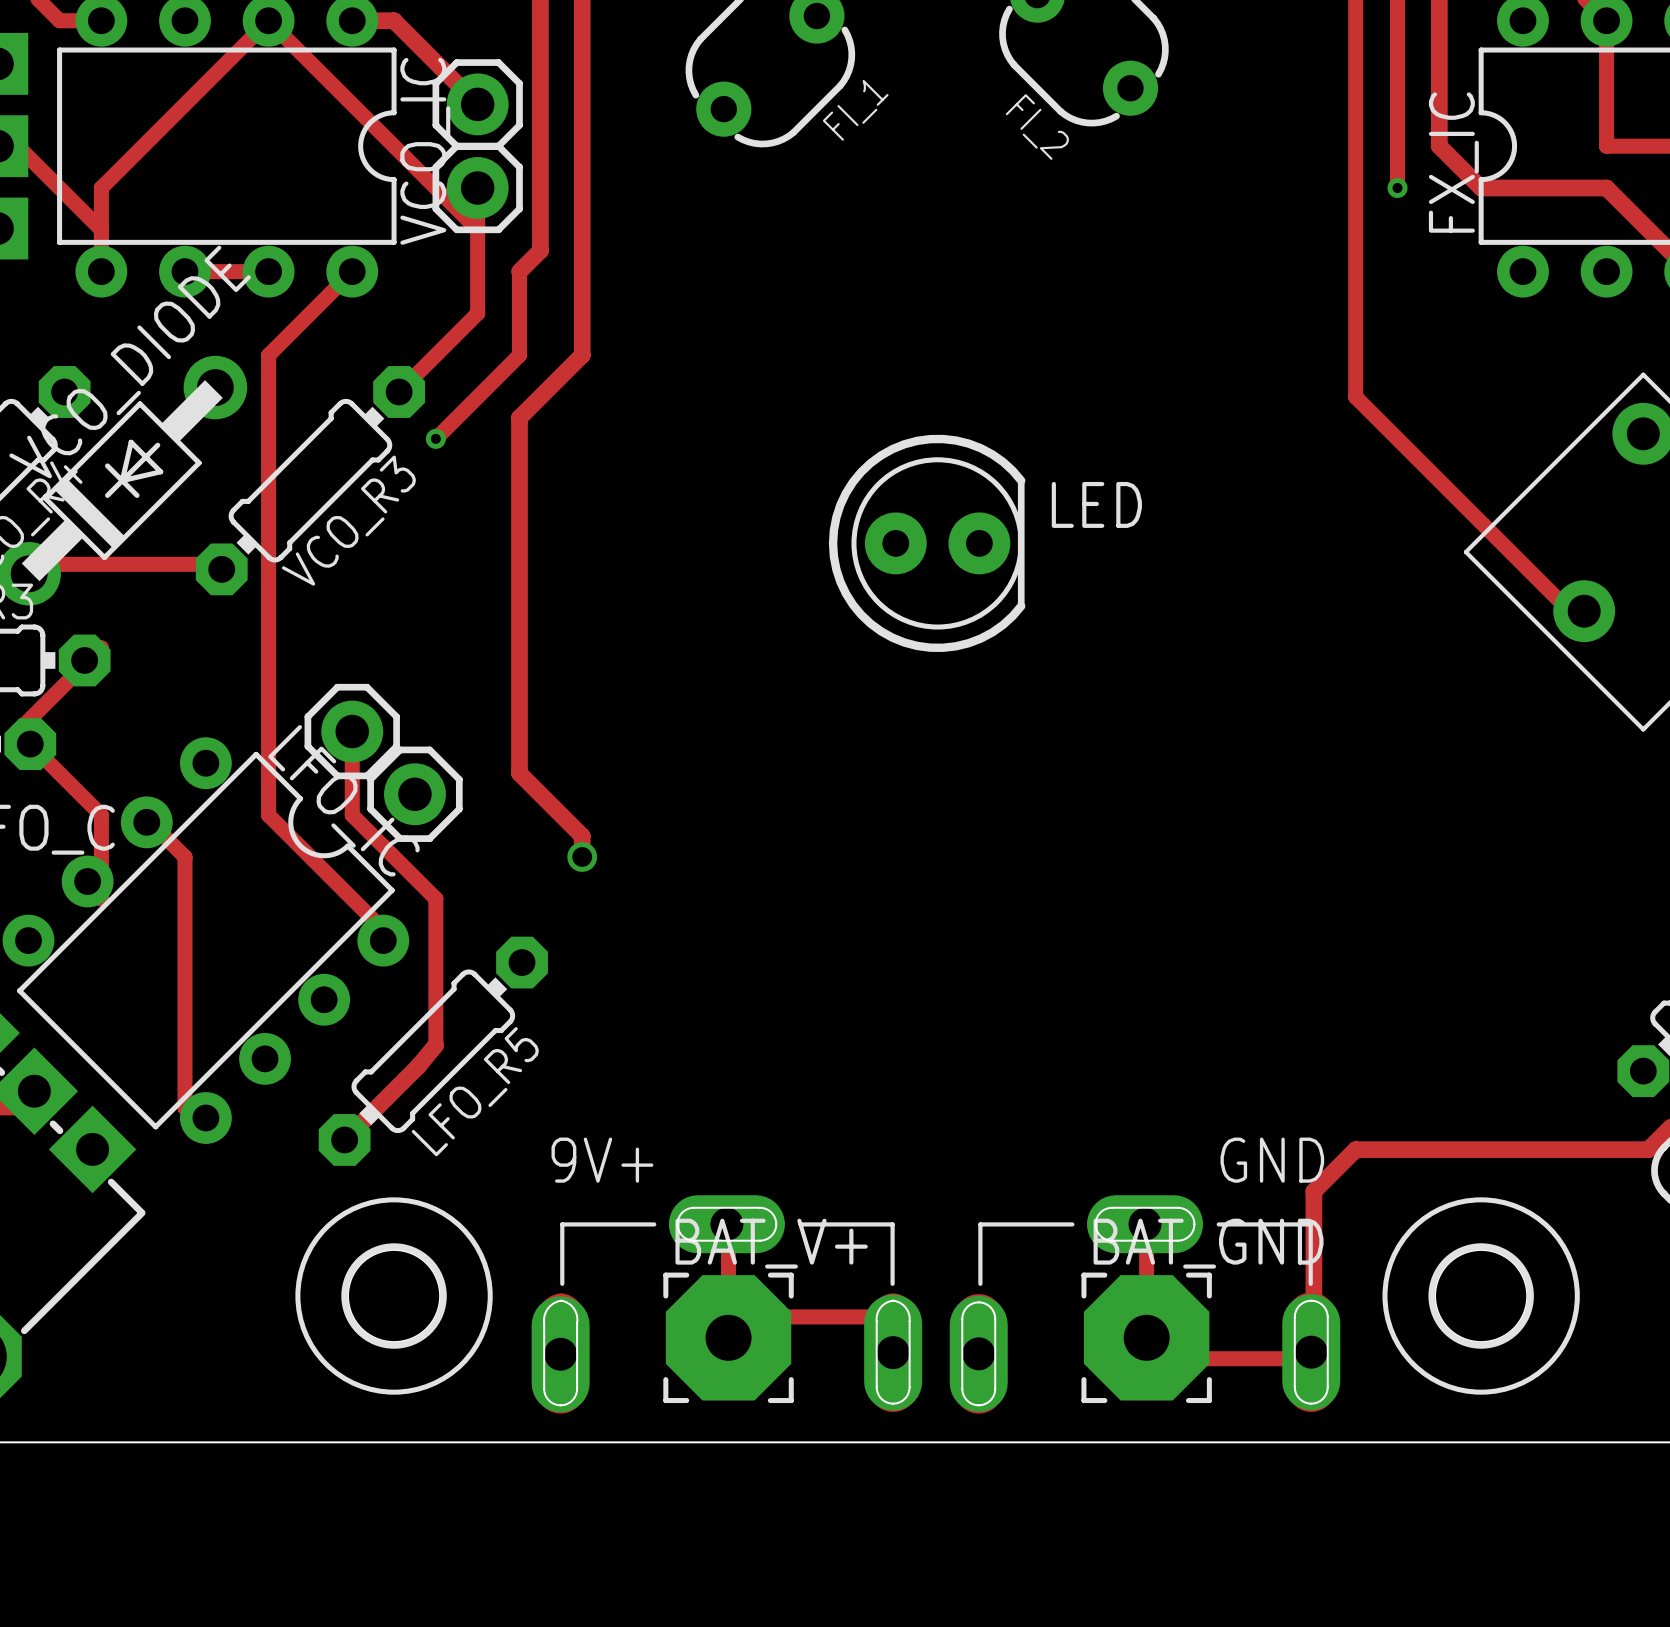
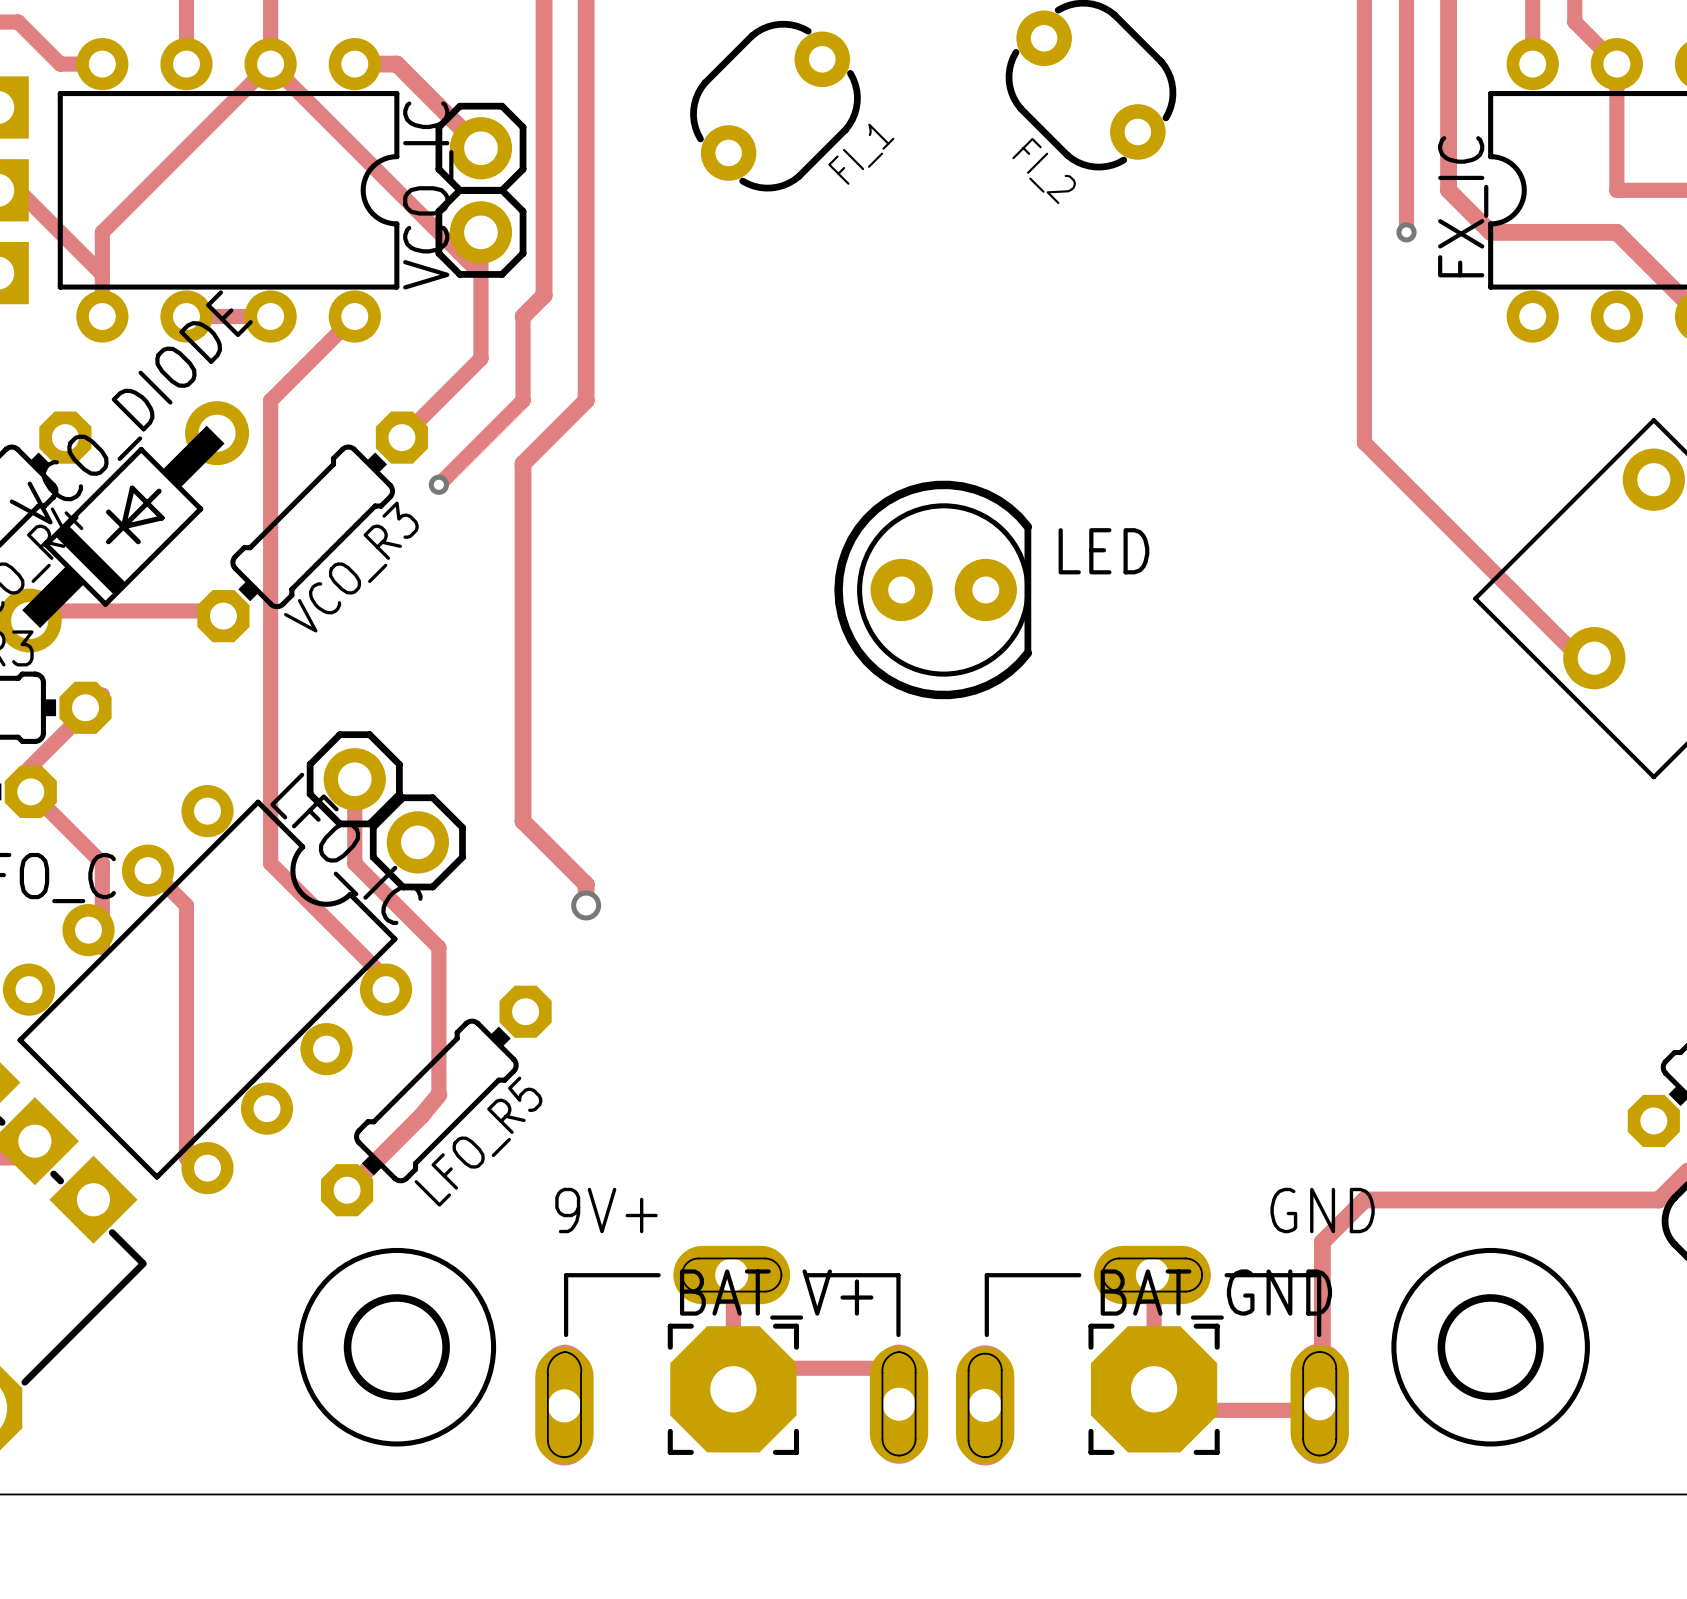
GND name position: GND (1272, 1160) -> GND (1322, 1210)

